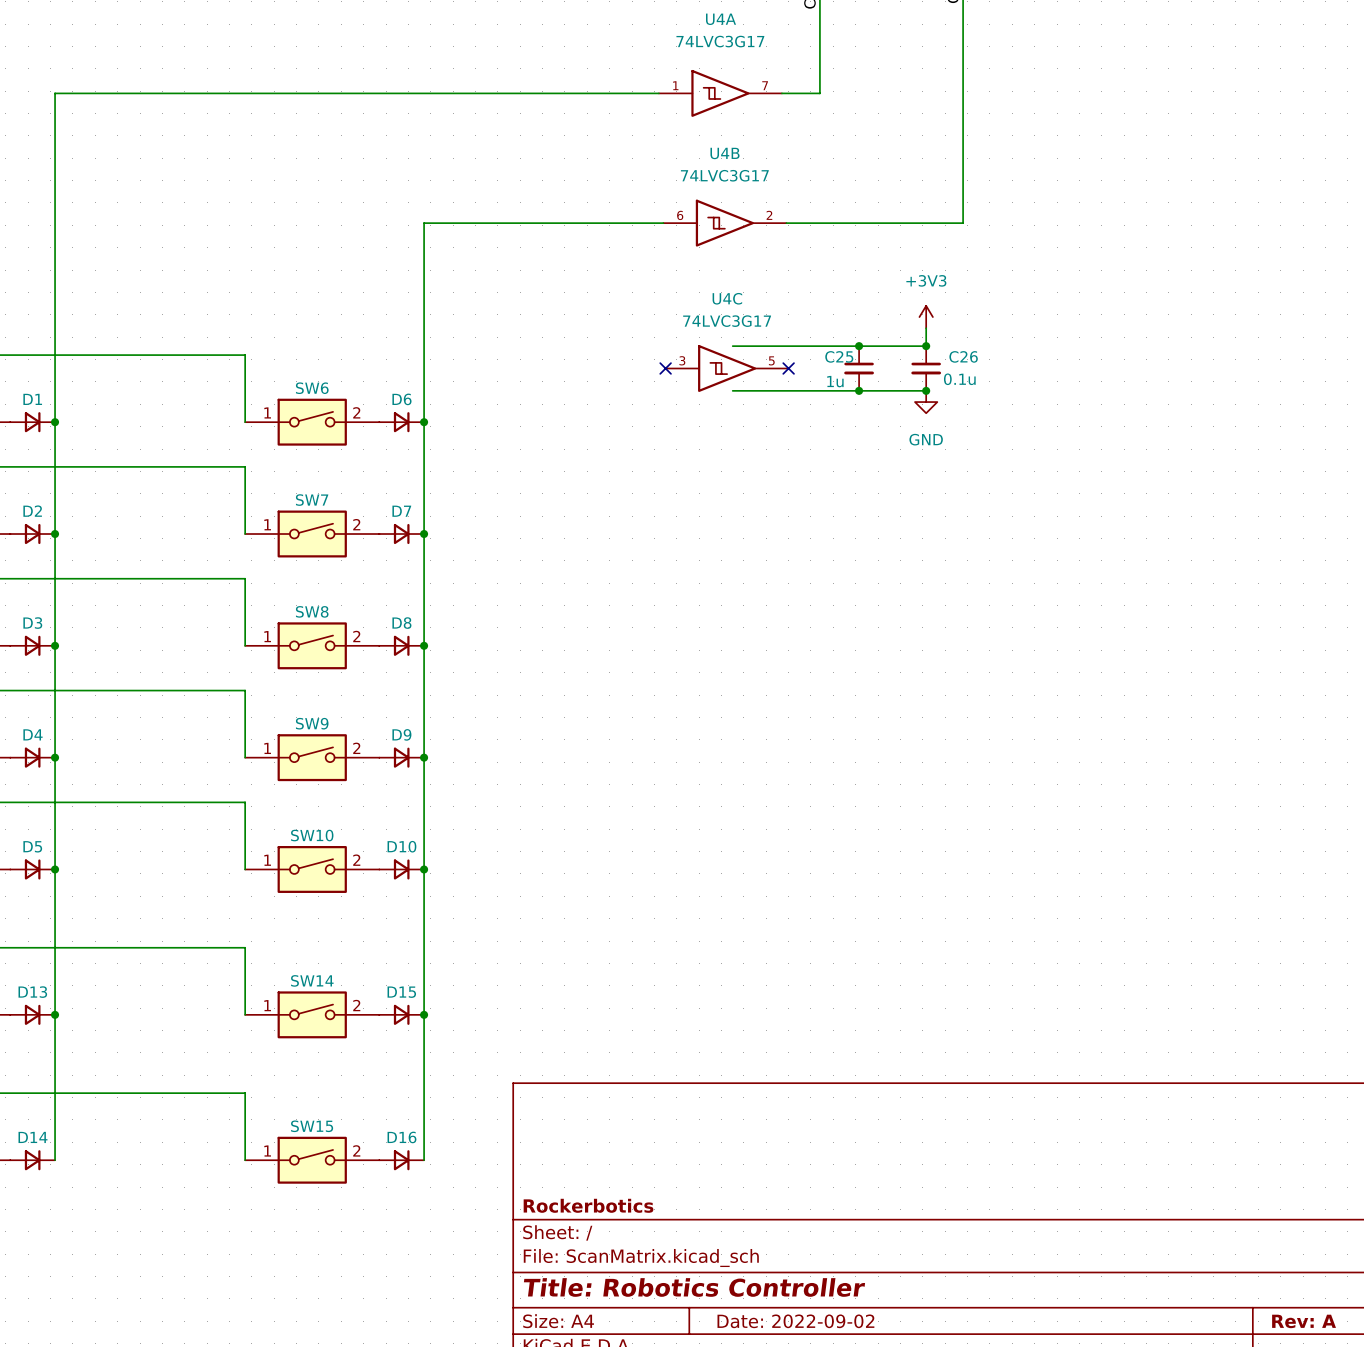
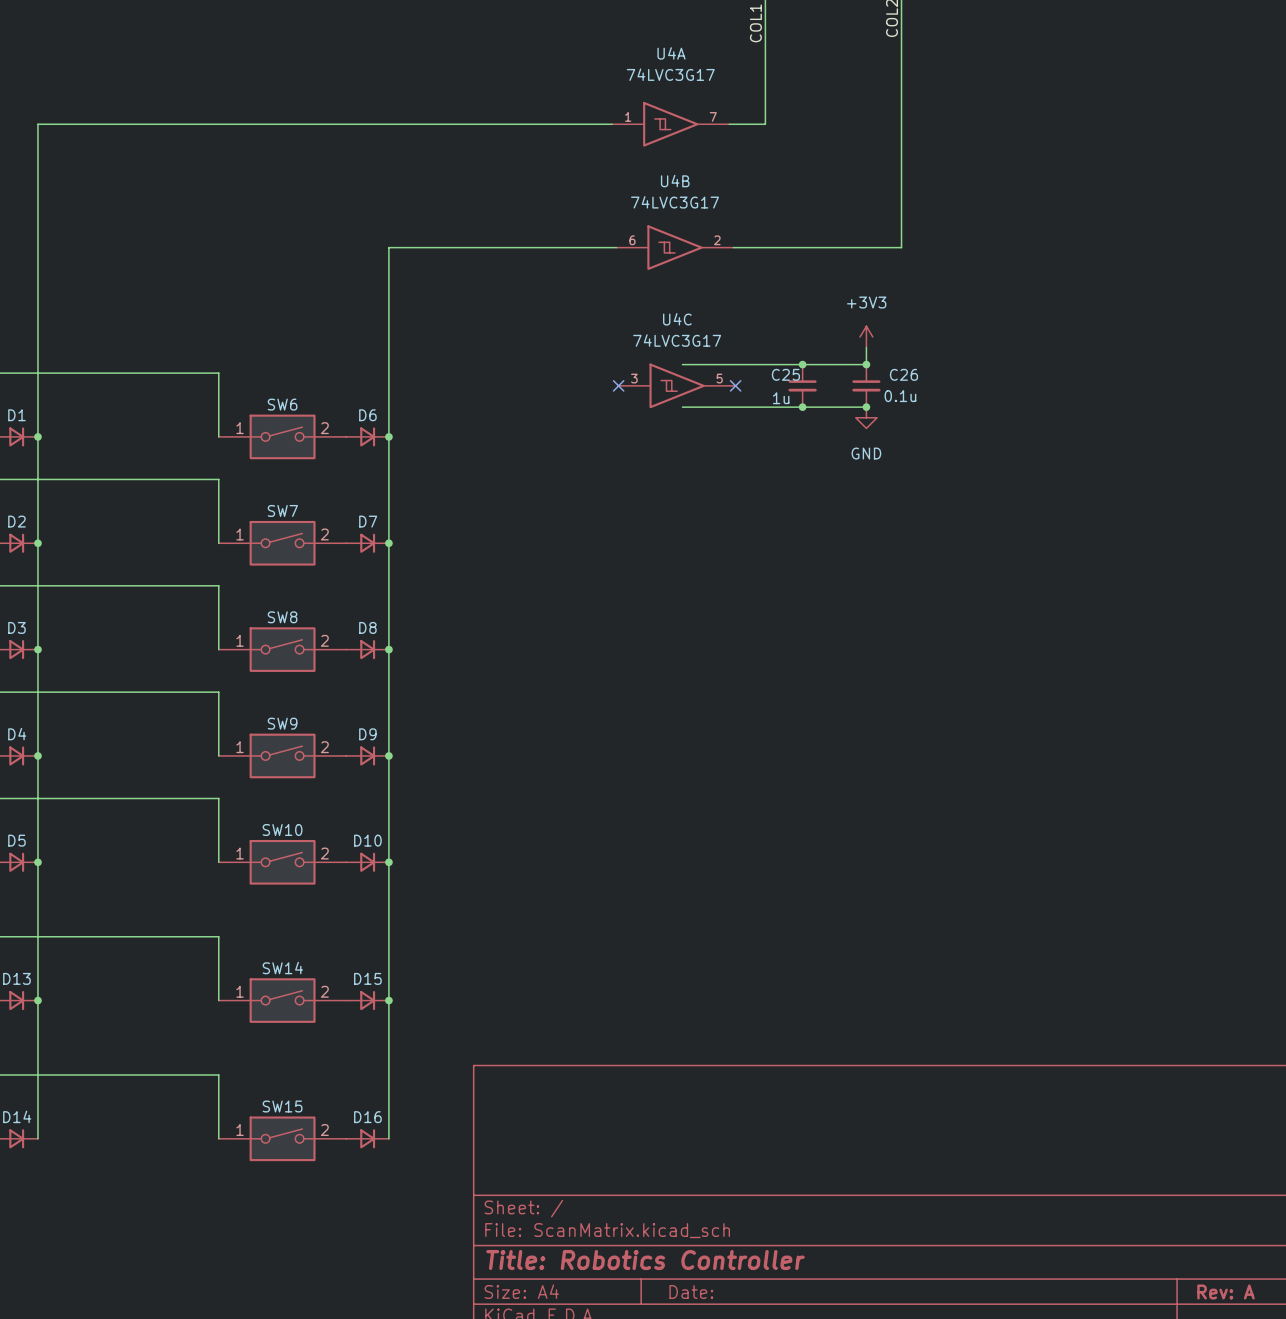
title block: Rockerbotics (588, 1205) -> none
title block: Date: 2022-09-02 (795, 1321) -> Date: (691, 1291)

